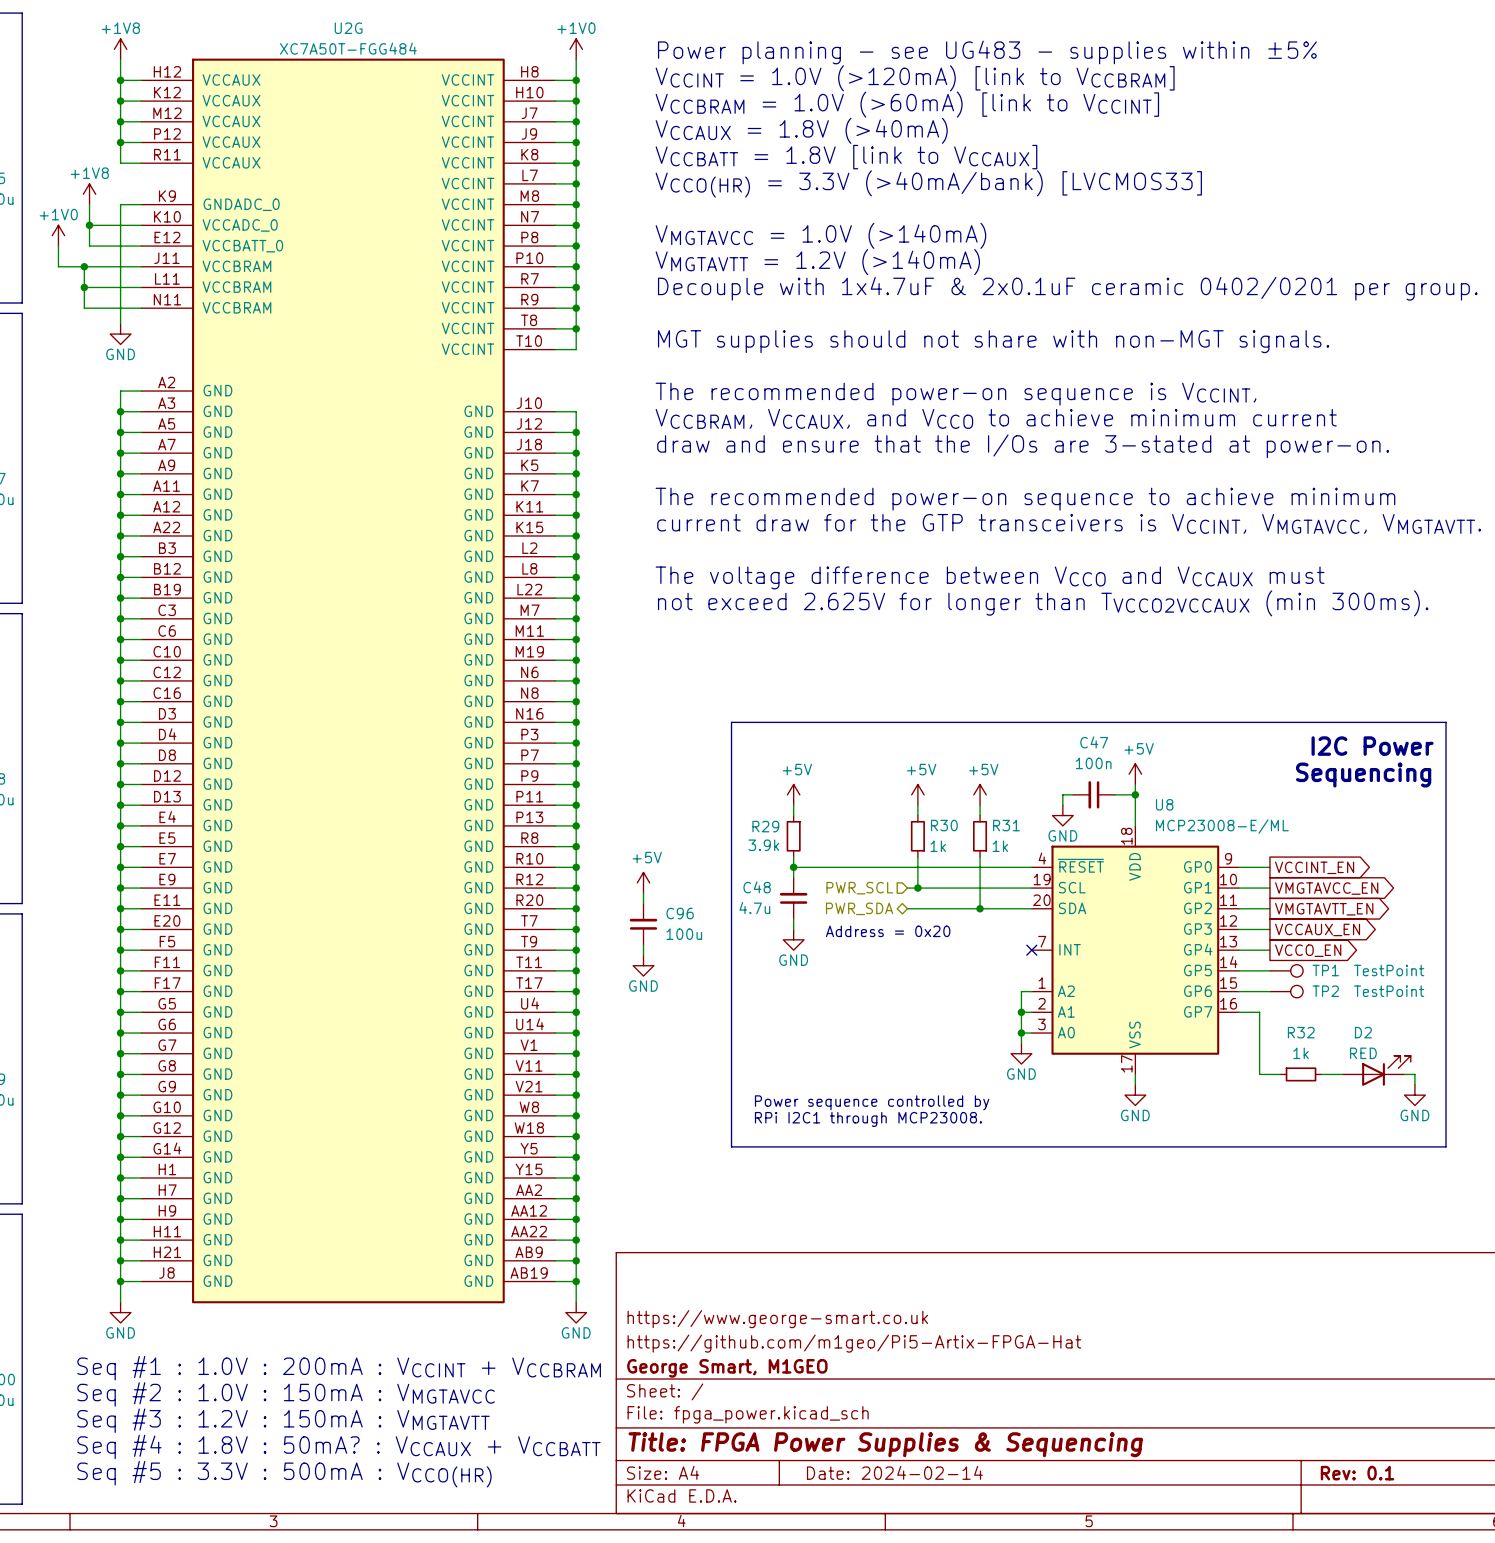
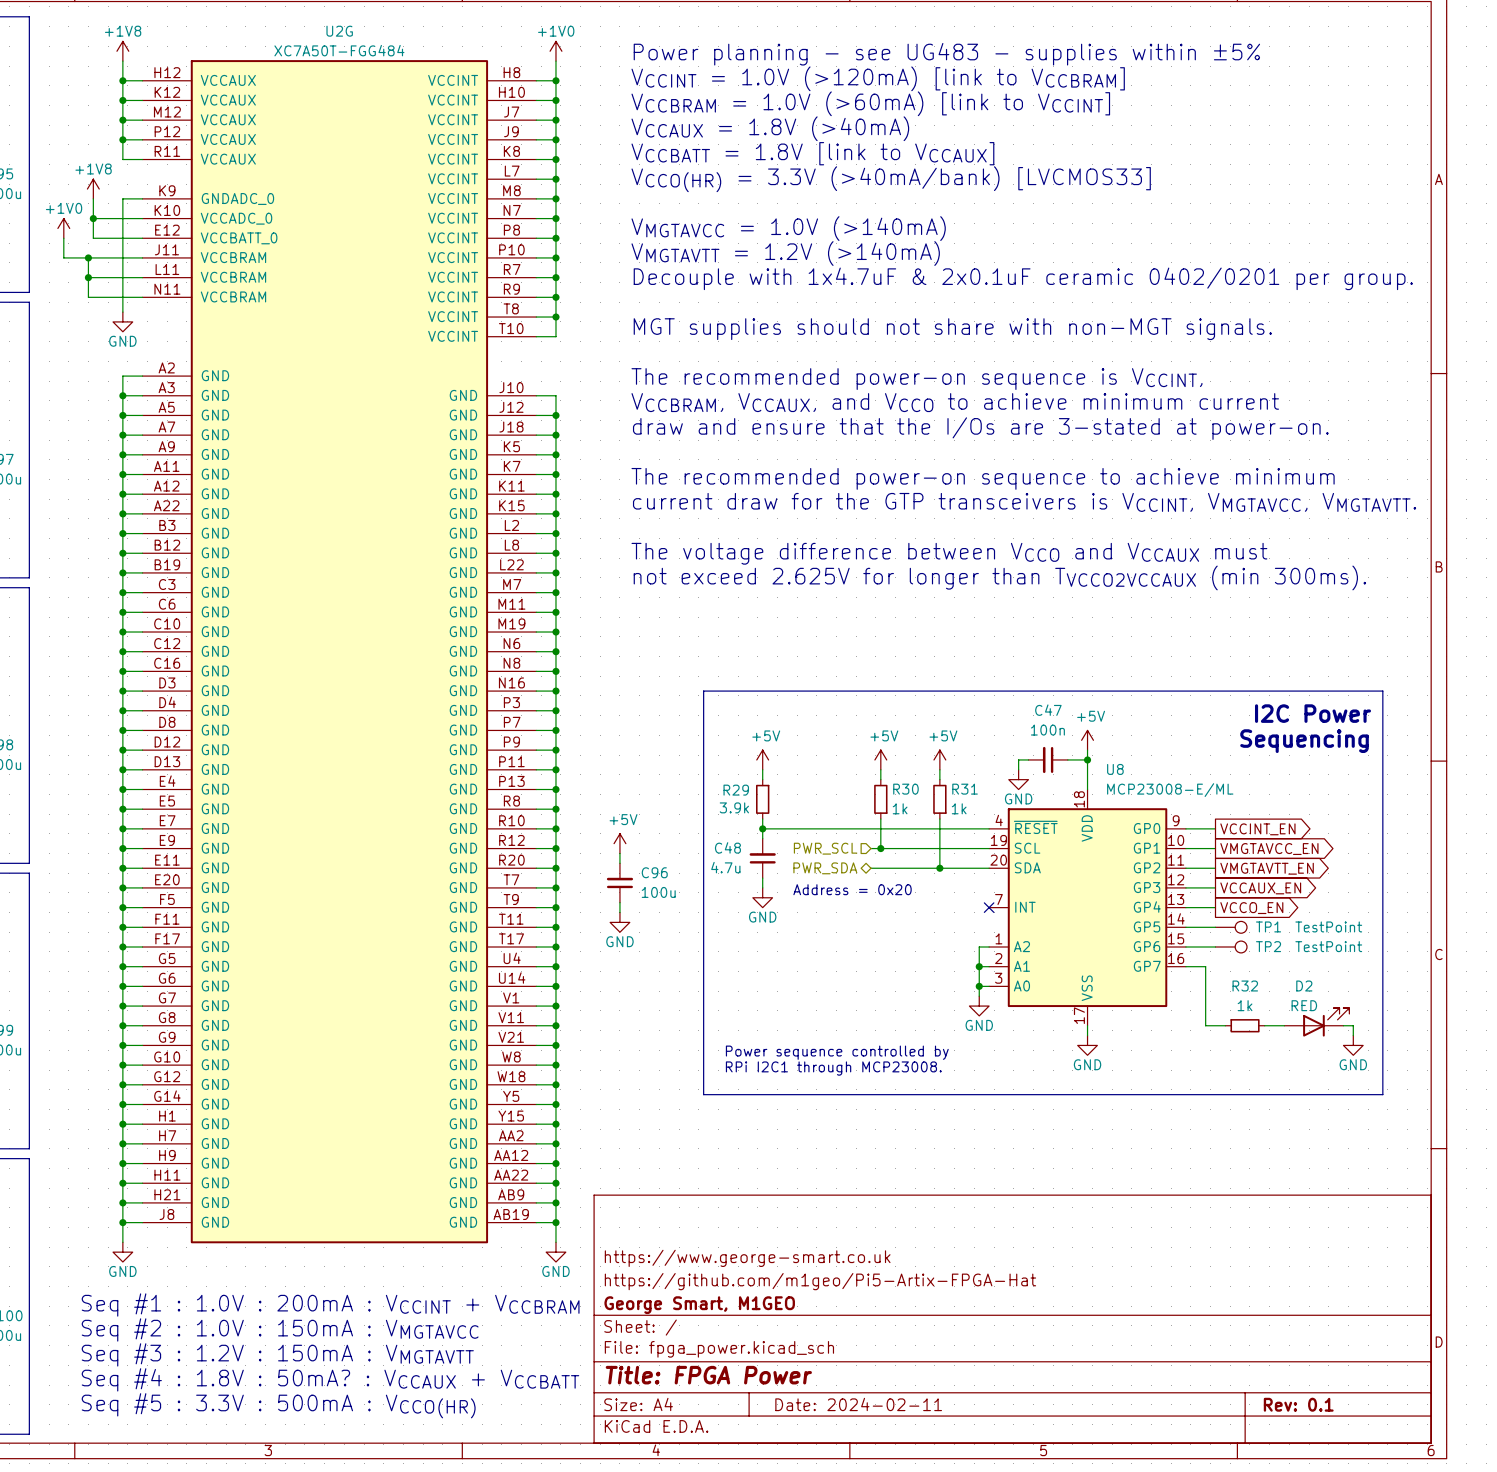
title block: Title: FPGA Power Supplies & Sequencing (885, 1444) -> Title: FPGA Power (708, 1375)
title block: Date: 2024-02-14 (894, 1472) -> Date: 2024-02-11 (858, 1404)

